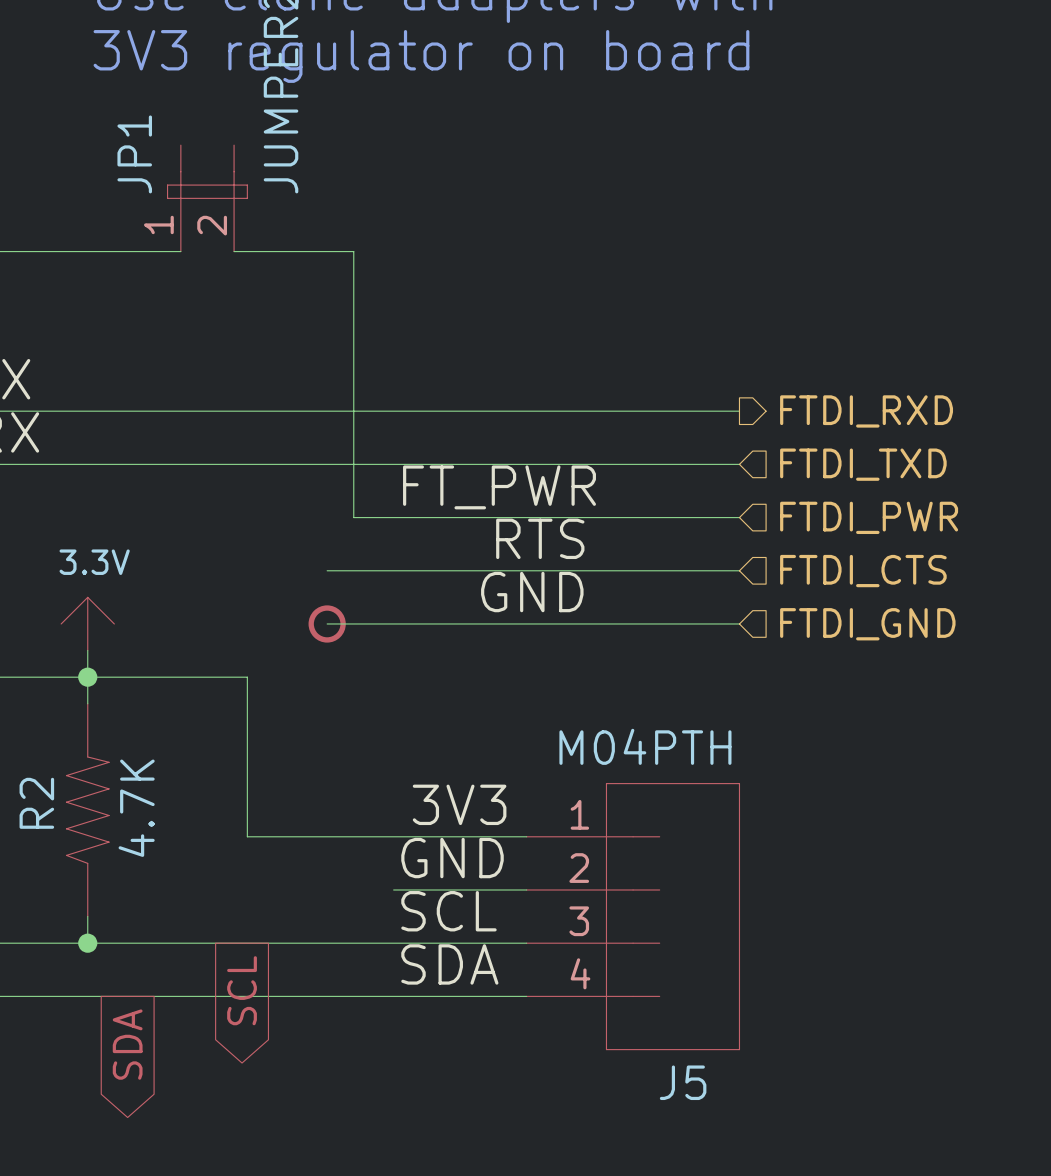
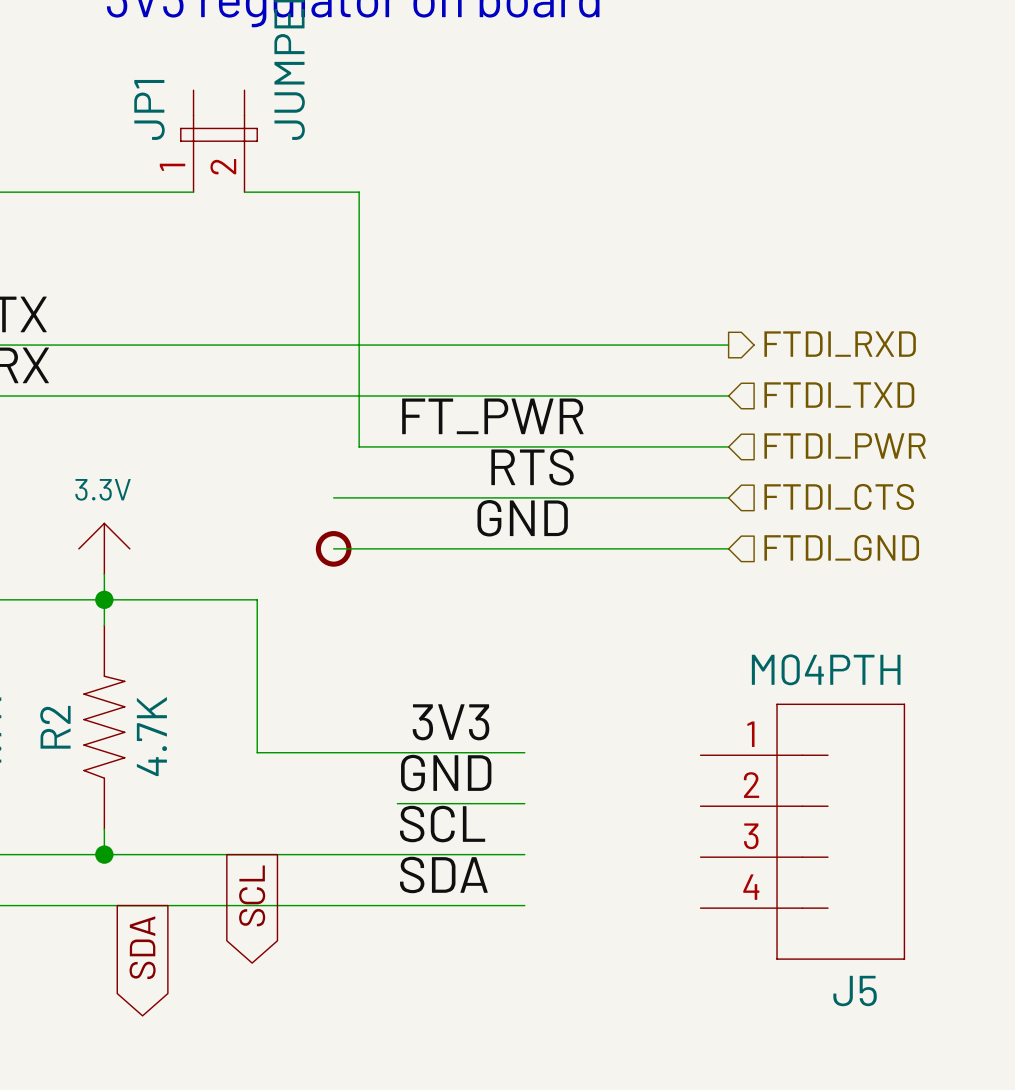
J5 position: (633, 916) -> (802, 831)

